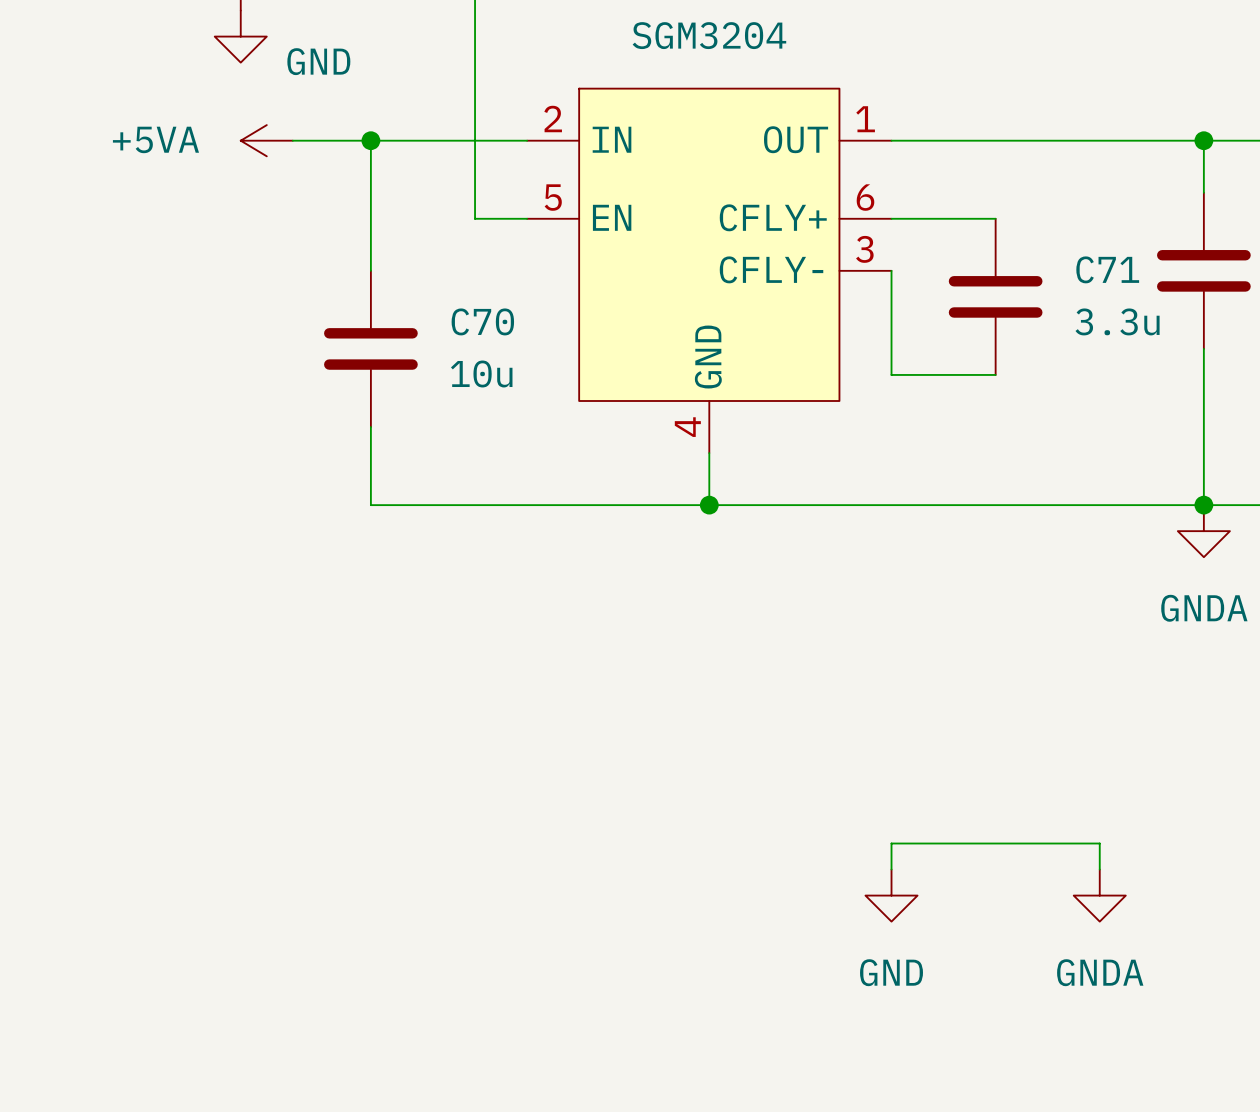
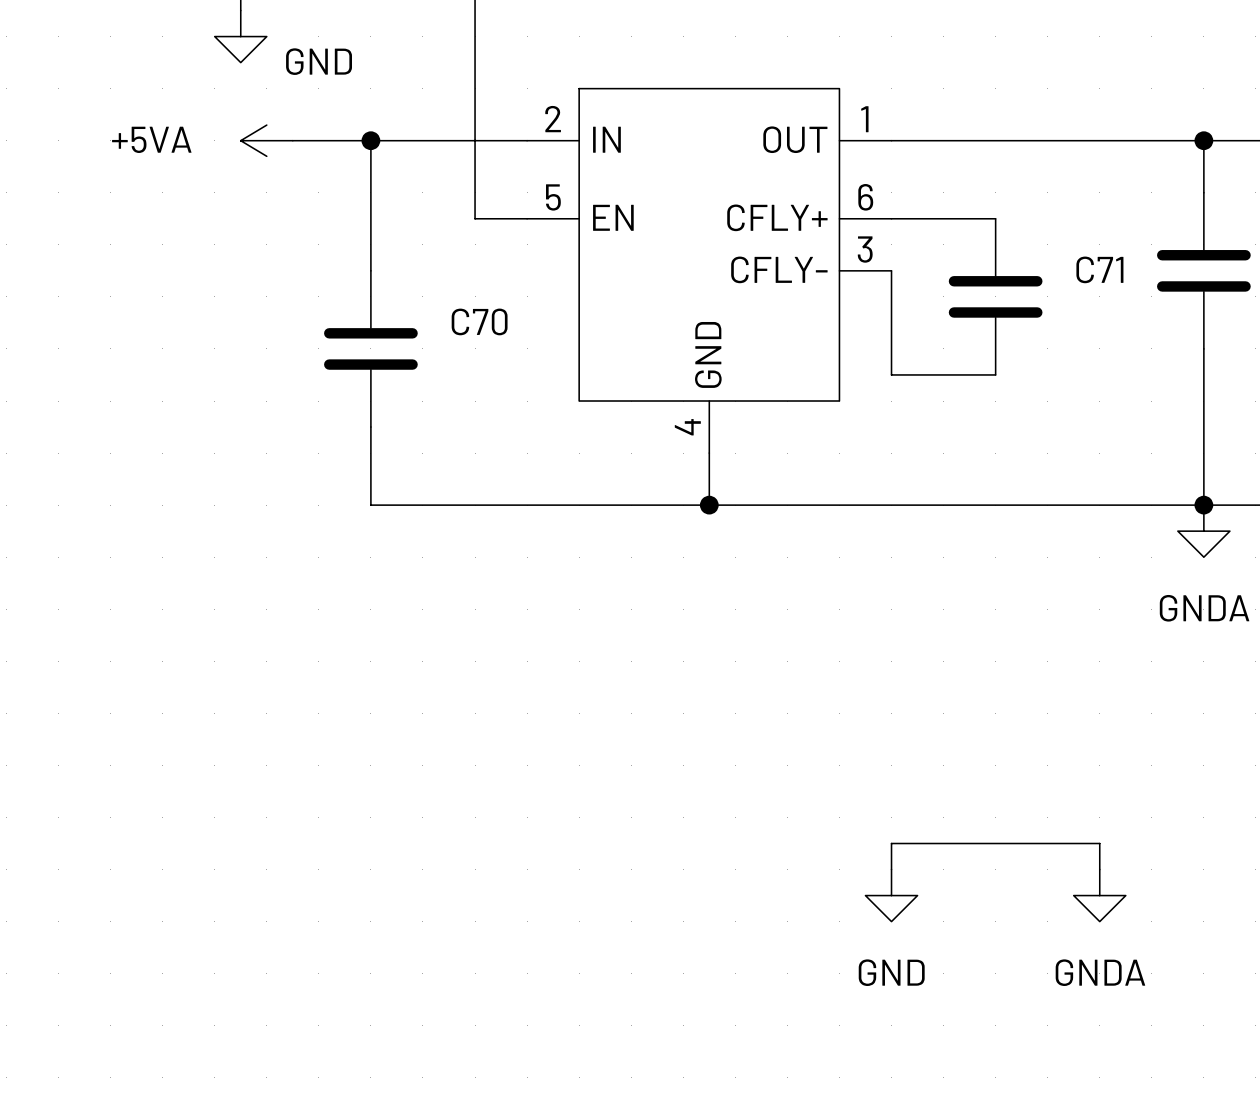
part value: SGM3204 (709, 35) -> none
C71 value: 3.3u (1117, 321) -> none
C70 value: 10u (481, 373) -> none

